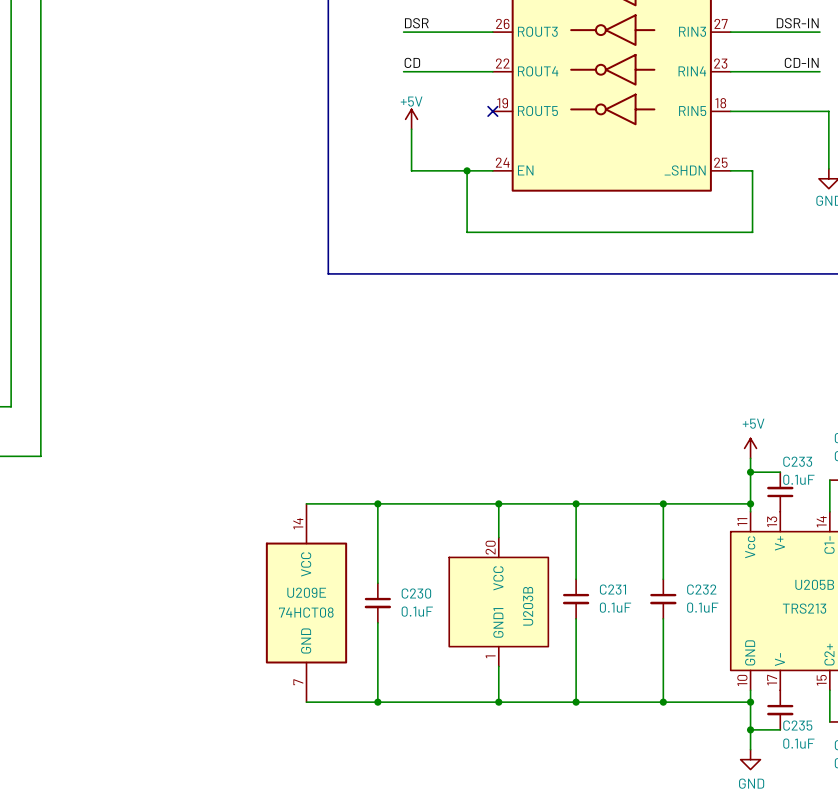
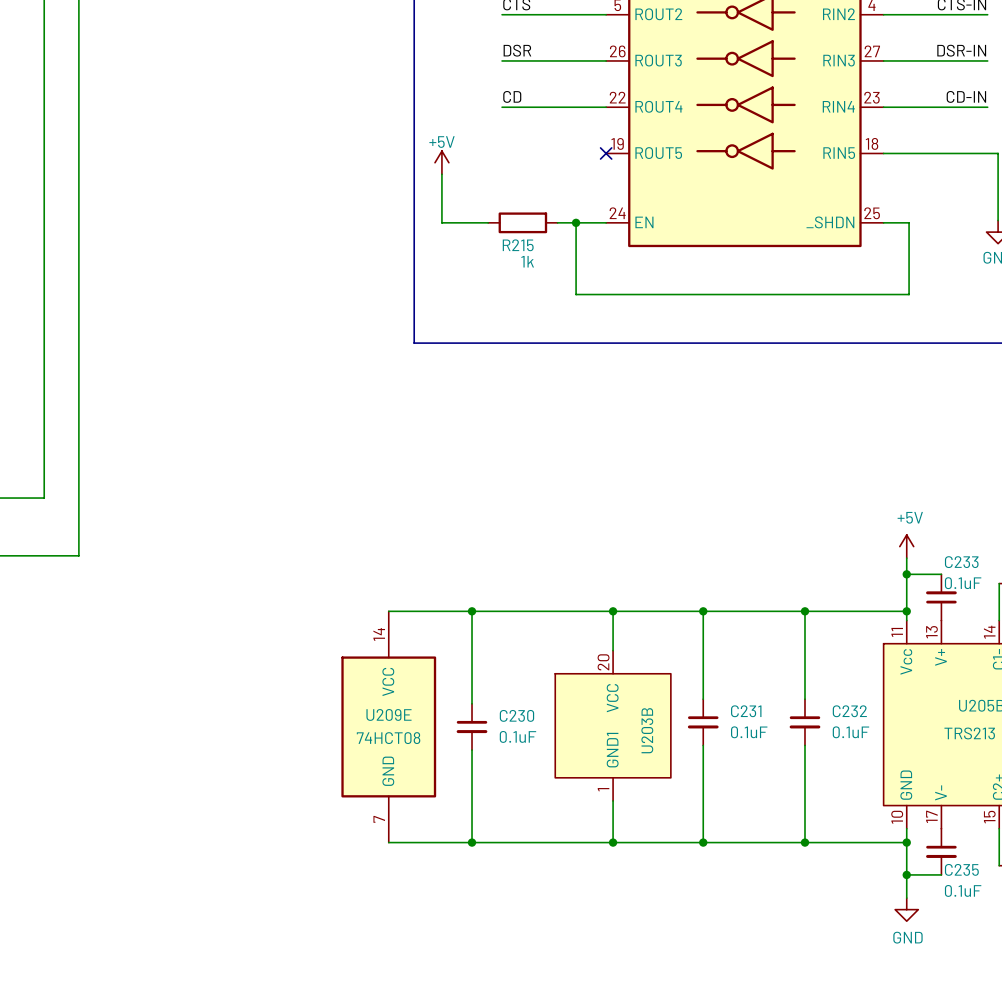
power symbol position: +5V (411, 119) -> +5V (441, 162)
wire: (411, 129) (411, 170) (451, 170) -> (441, 174) (441, 222) (488, 222)
R215: none -> 1k (522, 222)

